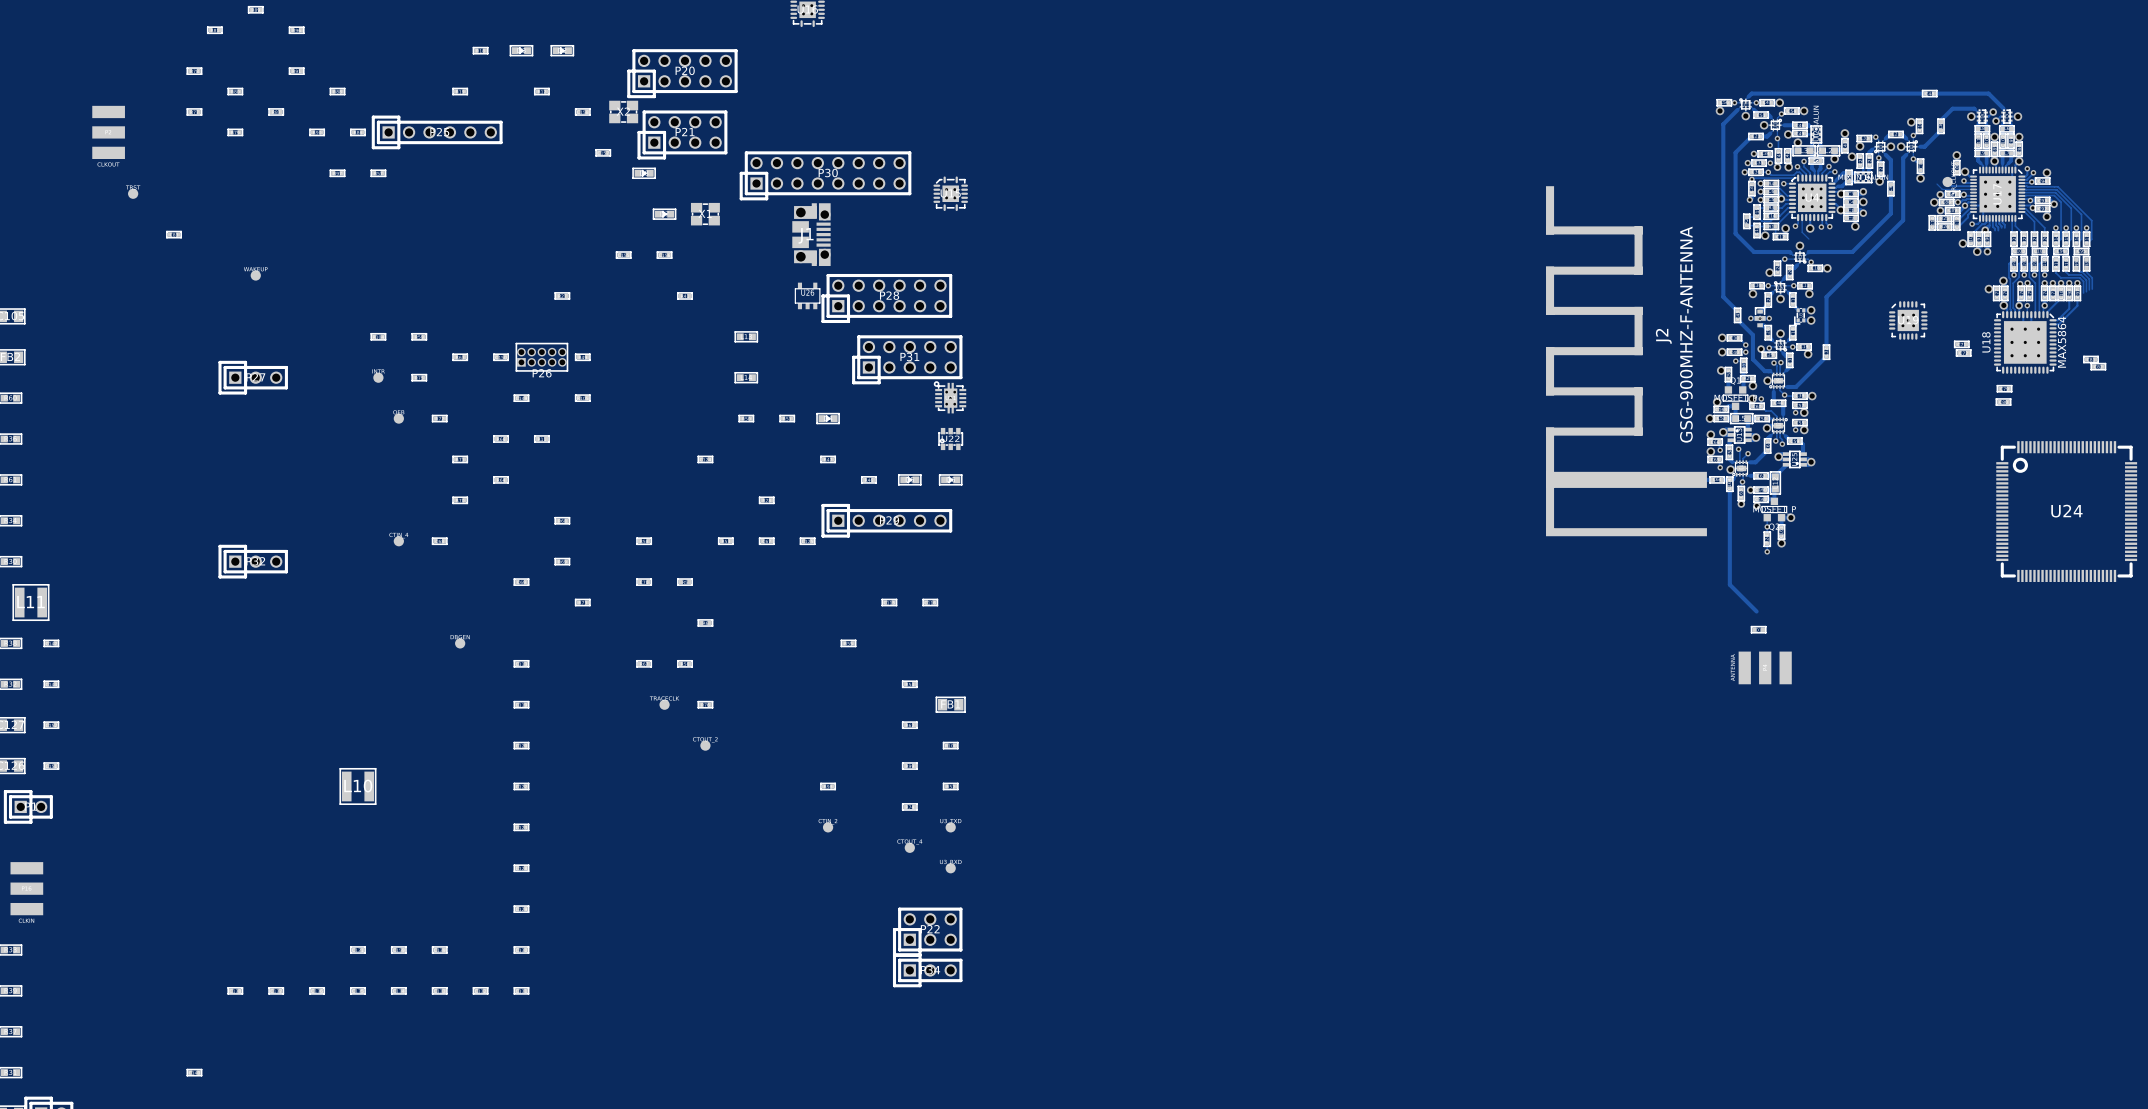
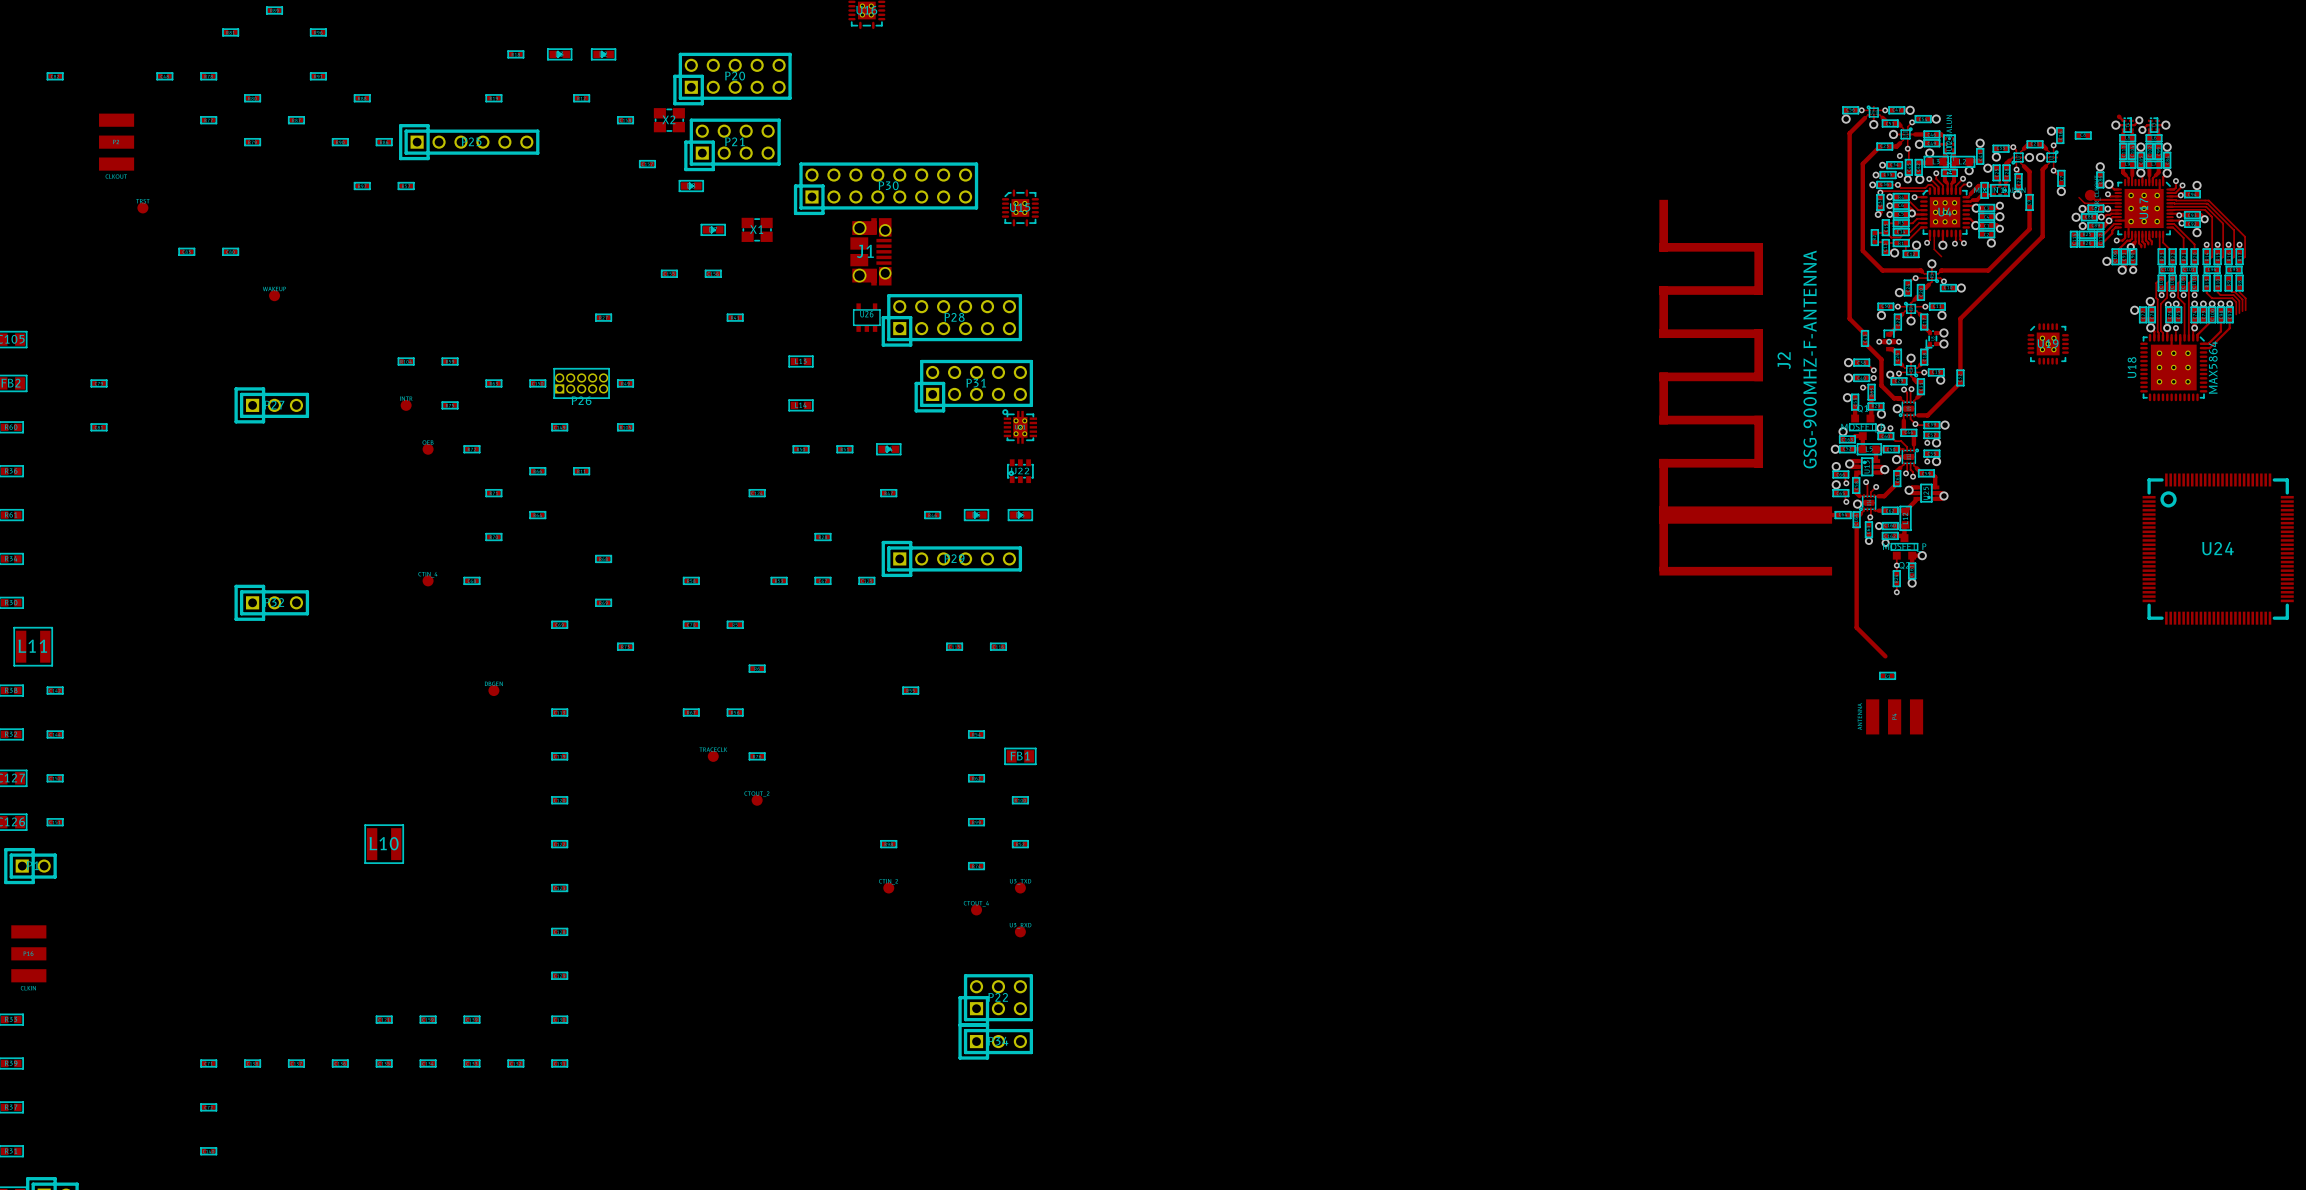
track: (1925, 93) (1751, 93) (1745, 101) -> none
part position: (1929, 93) -> (164, 76)
track: (1934, 93) (1988, 93) (2003, 108) -> none
track: (1974, 108) (1952, 108) (1940, 122) -> none
part rotation: 0° (1940, 126) -> 90° clockwise (2083, 135)
track: (1940, 130) (1924, 146) (1914, 146) -> none
part position: (1961, 344) -> (208, 1063)
part position: (1963, 352) -> (208, 1107)
part position: (2091, 359) -> (99, 427)
part position: (2098, 366) -> (55, 76)
part position: (2004, 388) -> (99, 383)
part position: (2003, 402) -> (230, 251)

